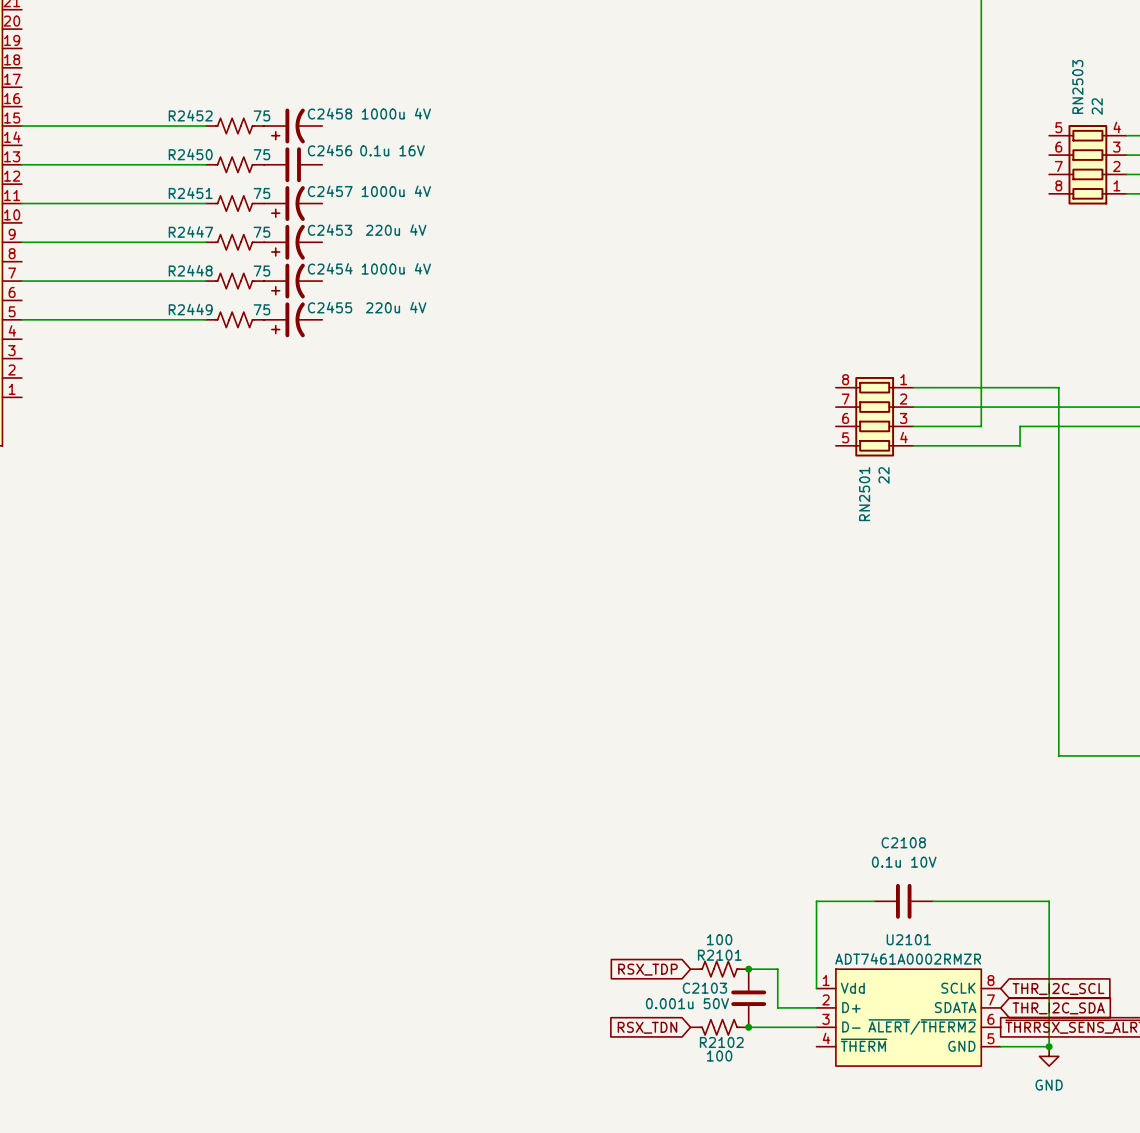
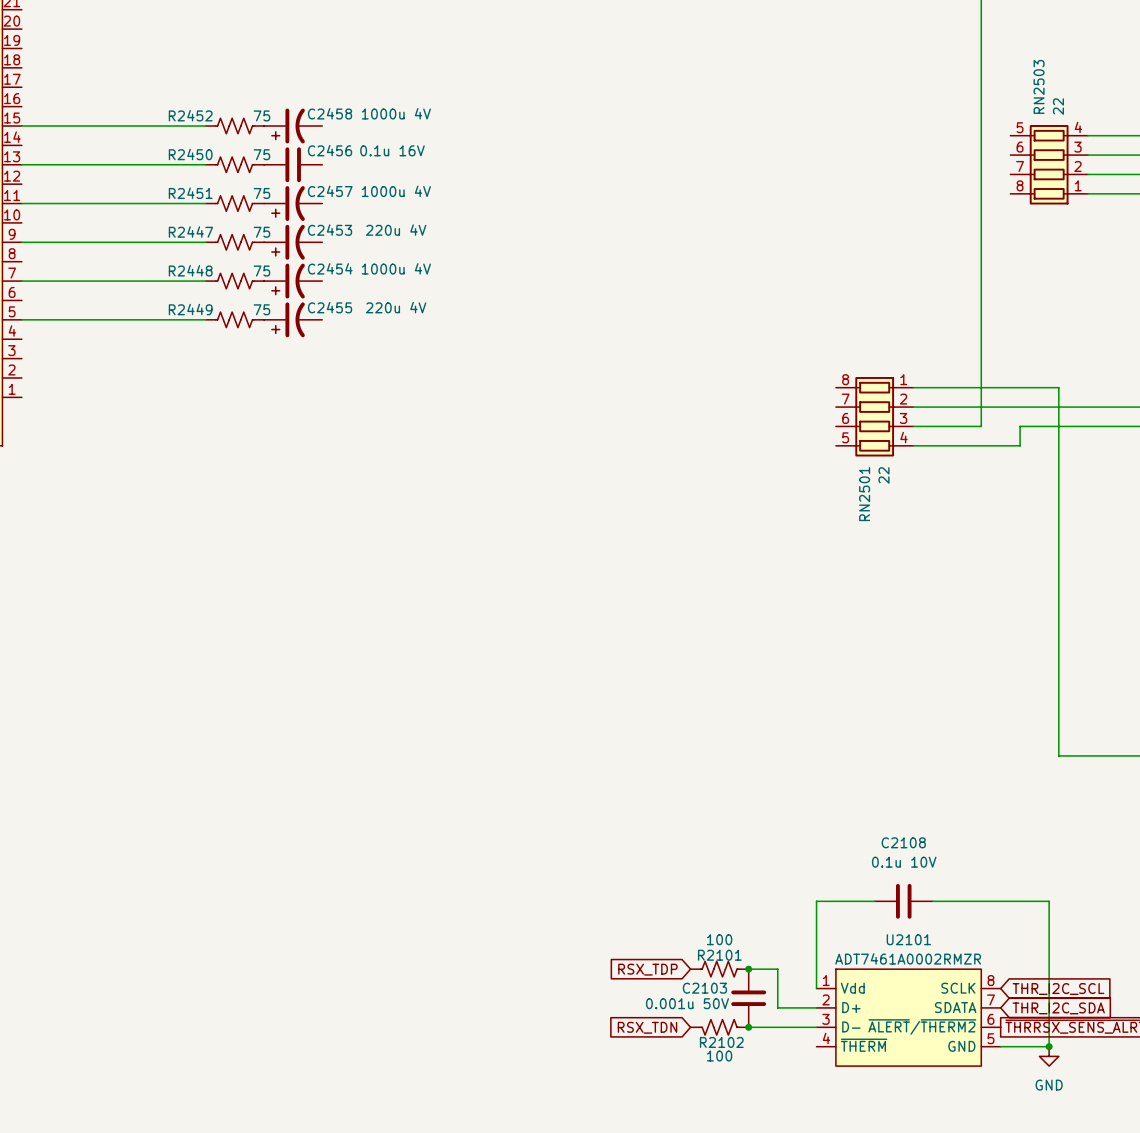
RN2503 position: (1087, 164) -> (1049, 164)

